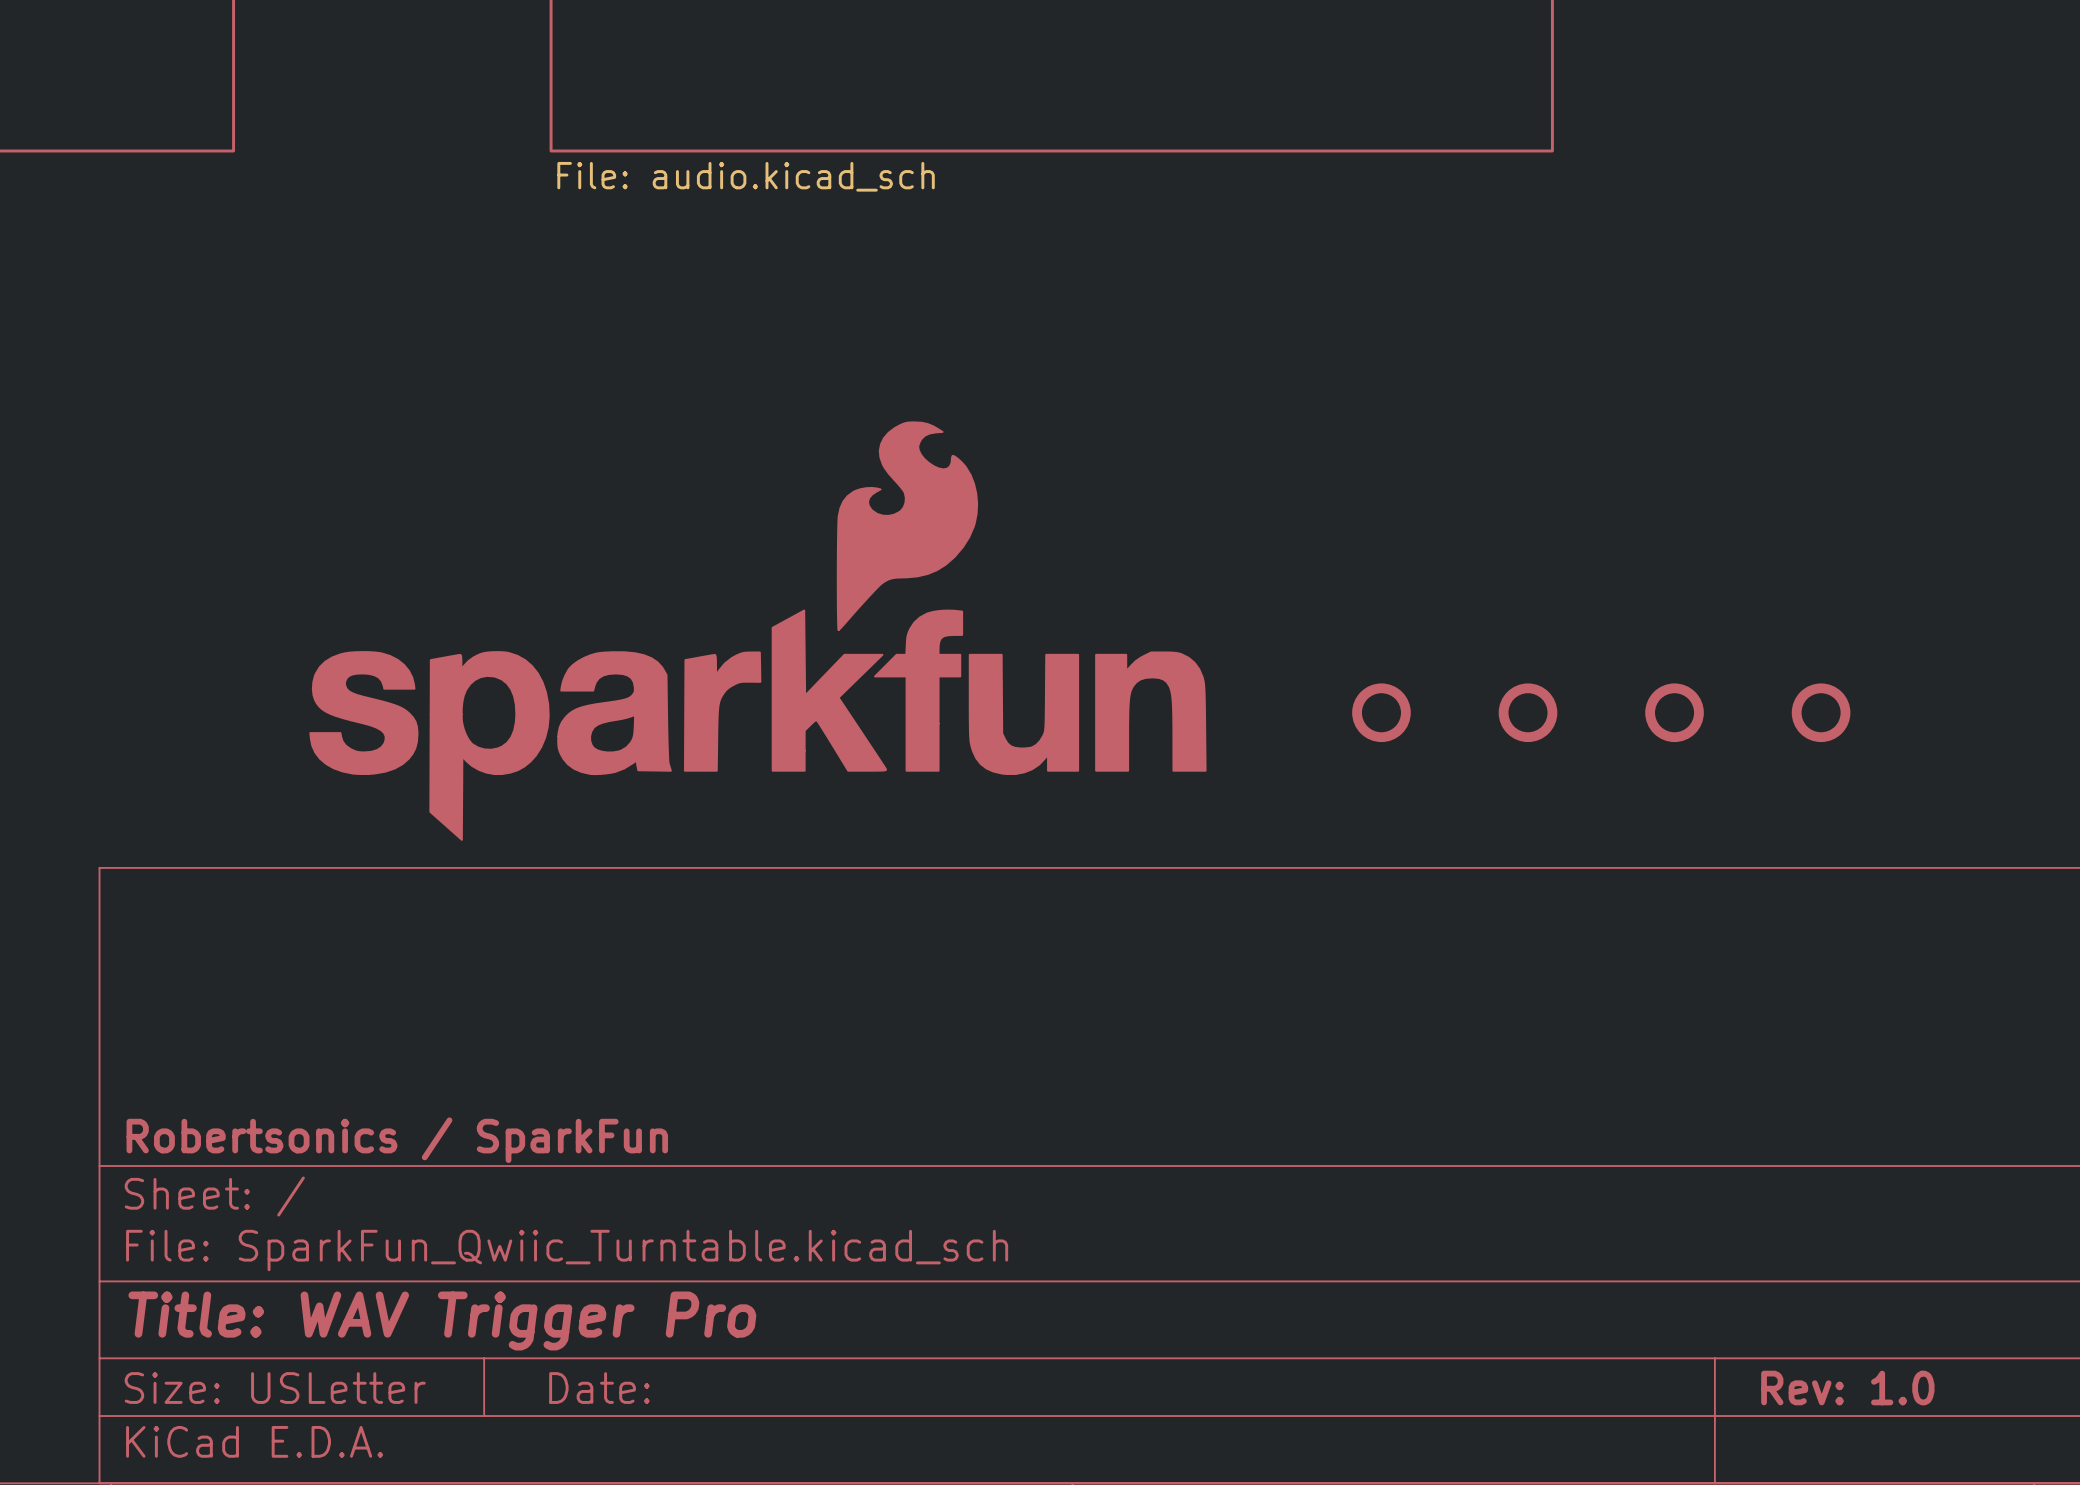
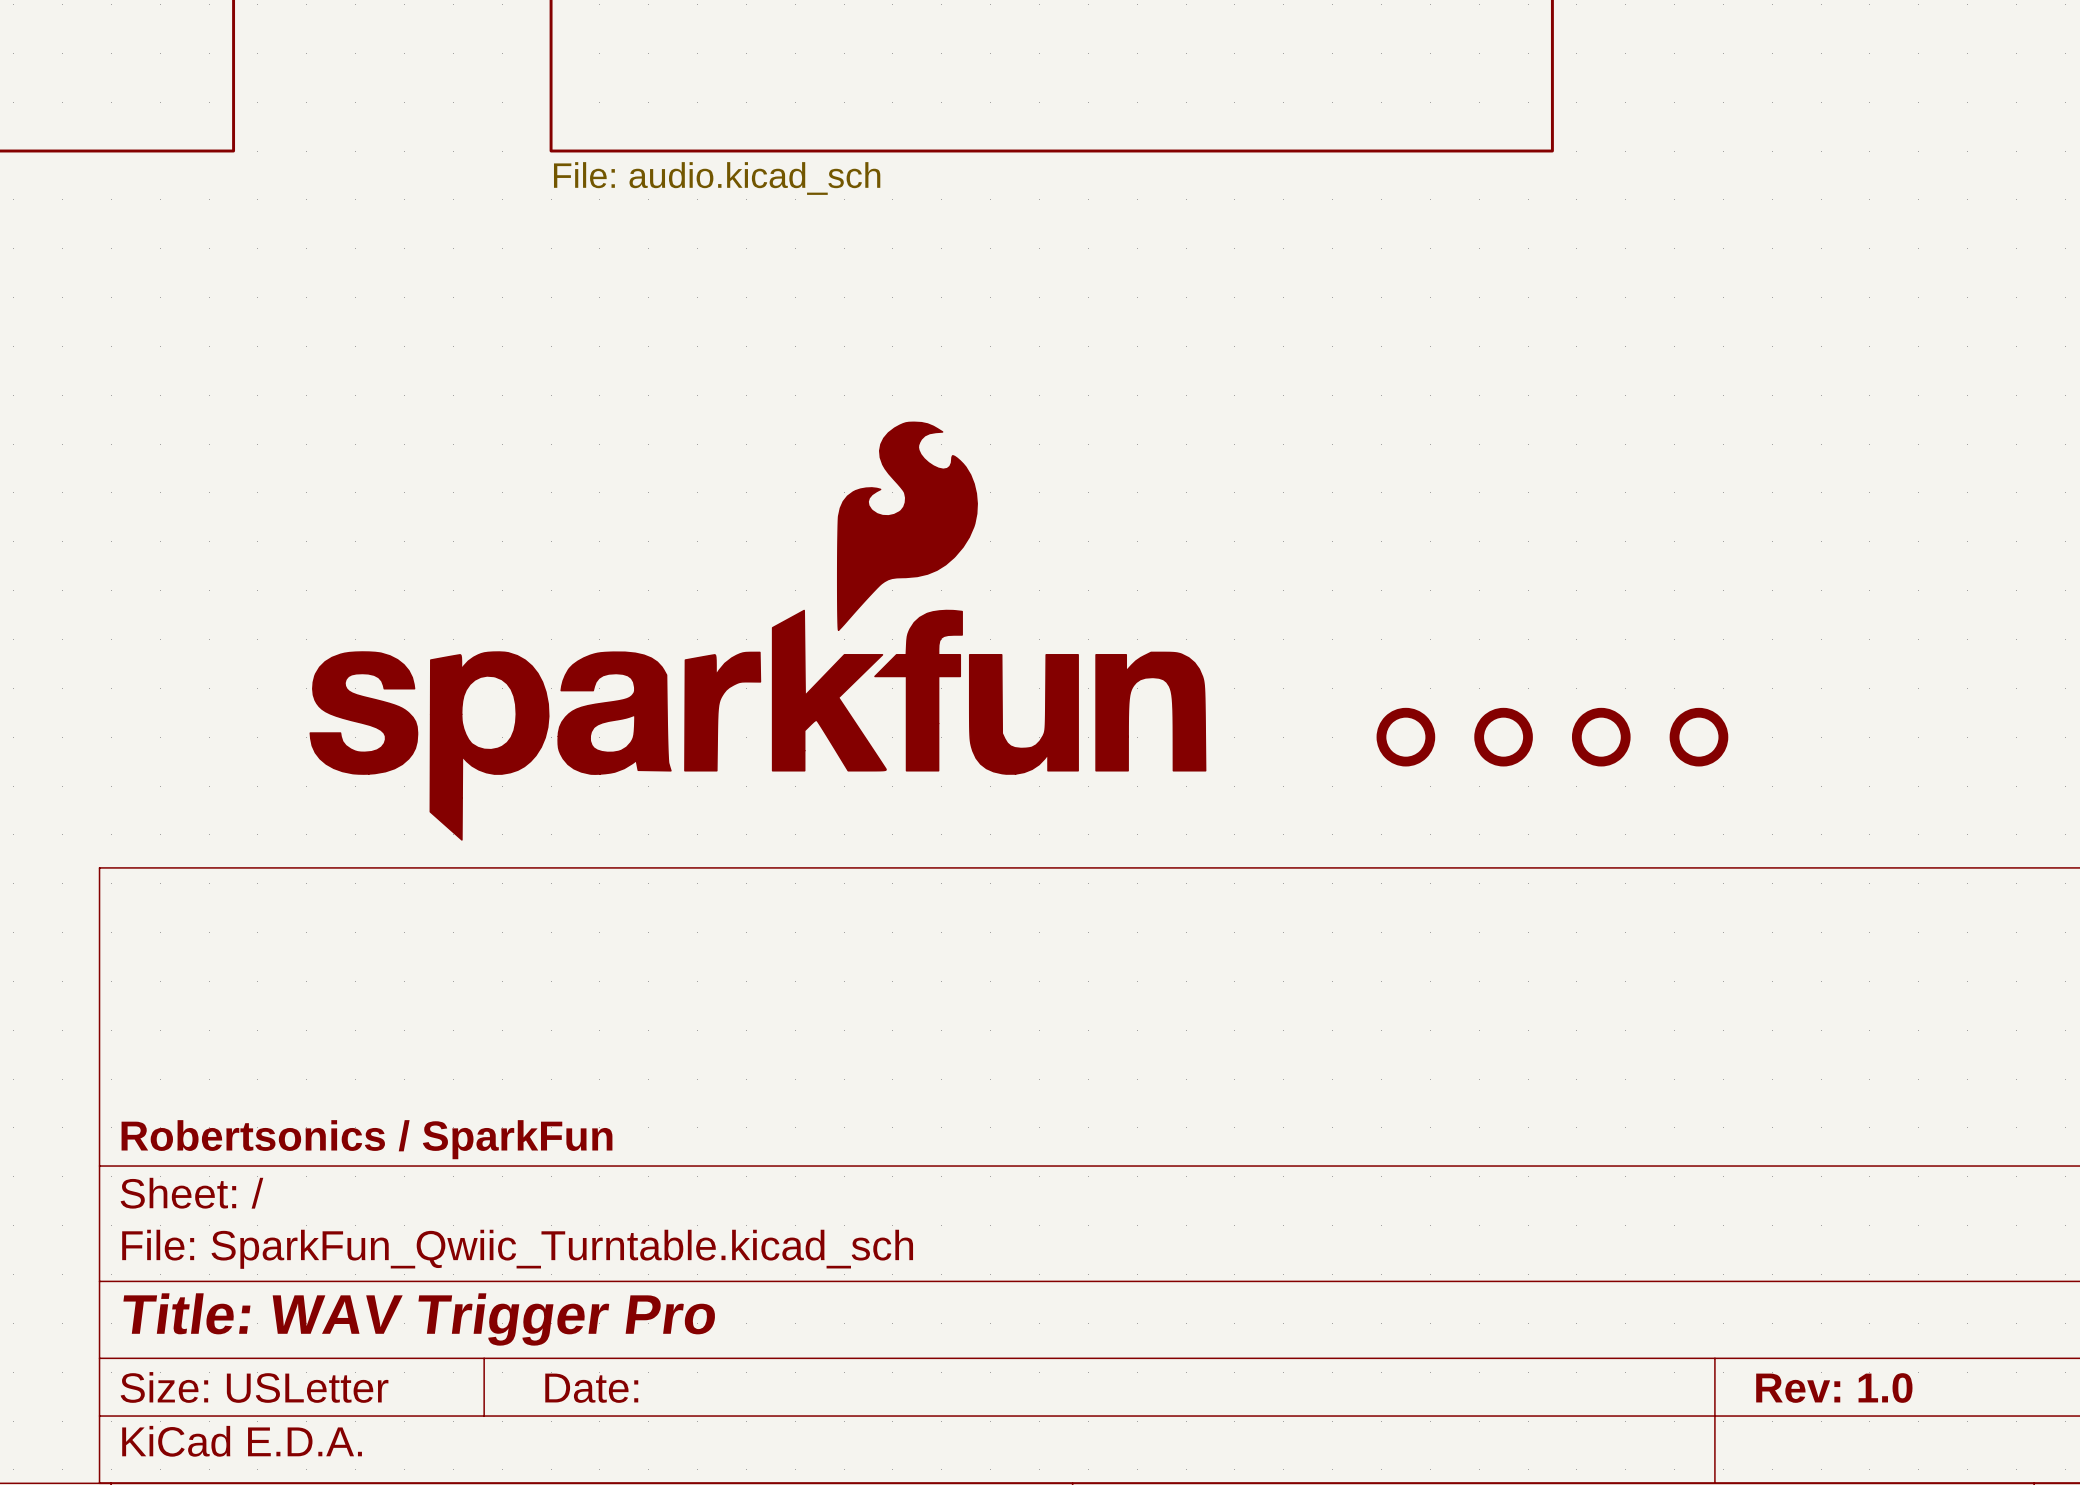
part position: (1381, 712) -> (1405, 737)
part position: (1528, 712) -> (1503, 737)
part position: (1674, 712) -> (1698, 737)
part: (1821, 712) -> none
part: none -> (1601, 737)

